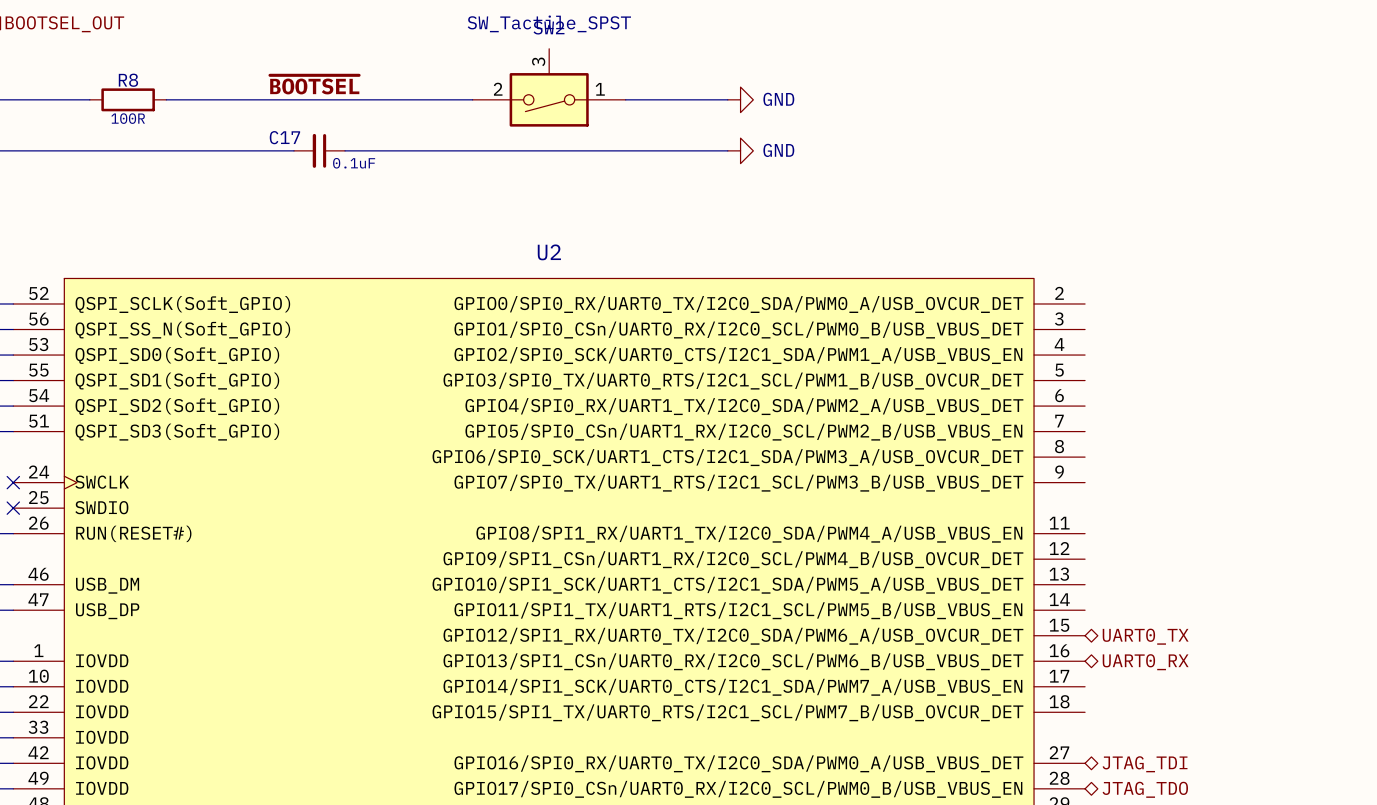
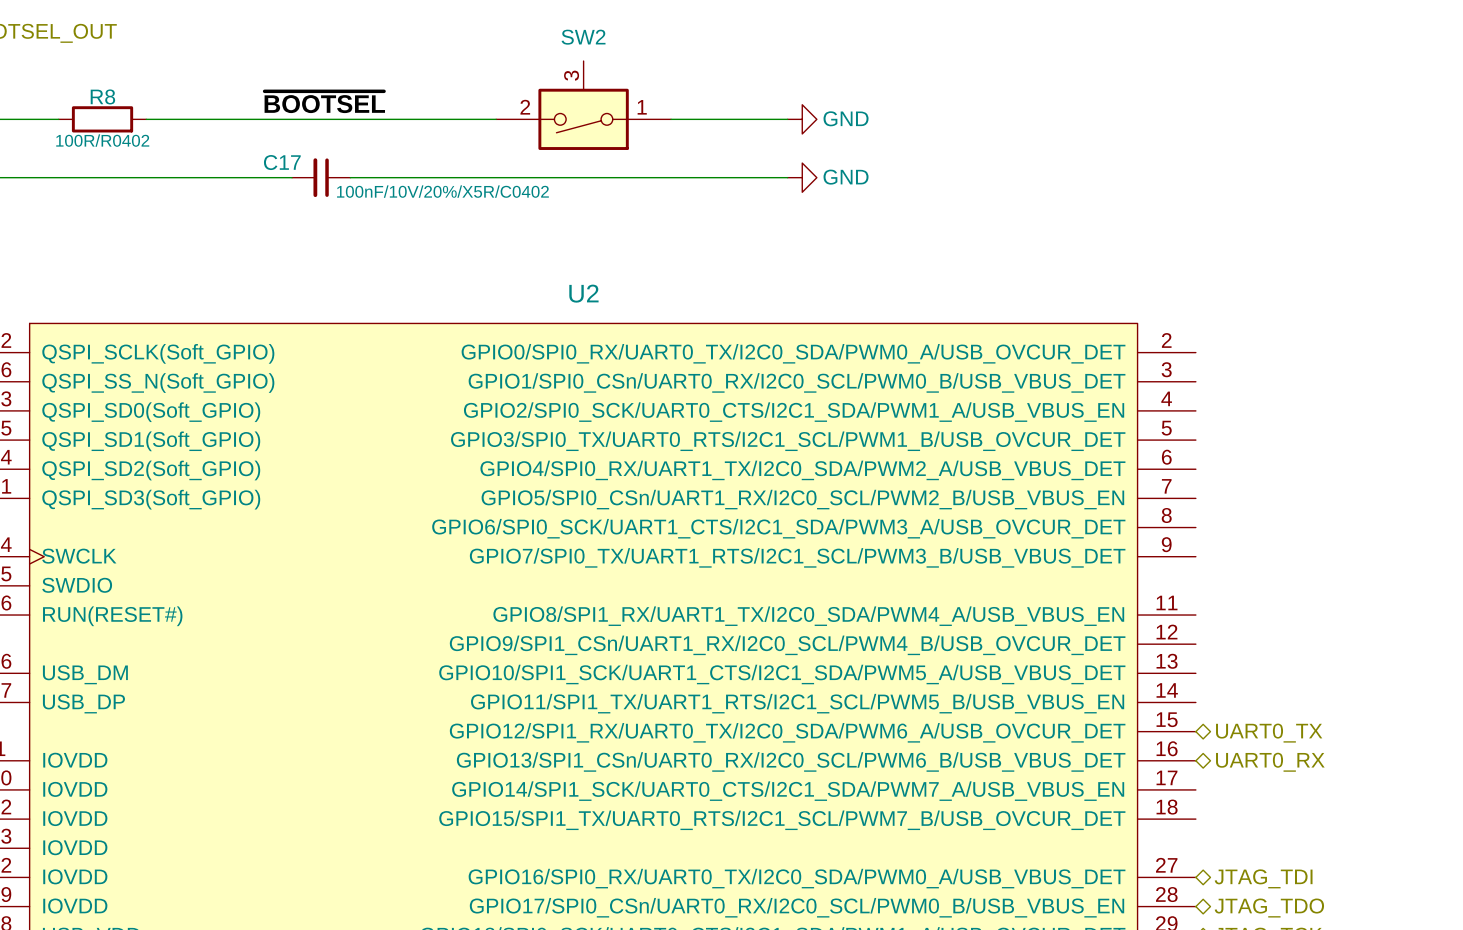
SW2 value: SW_Tactile_SPST (549, 23) -> none
R8 value: 100R (128, 118) -> 100R/R0402 (102, 140)
C17 value: 0.1uF (354, 163) -> 100nF/10V/20%/X5R/C0402 (442, 191)

